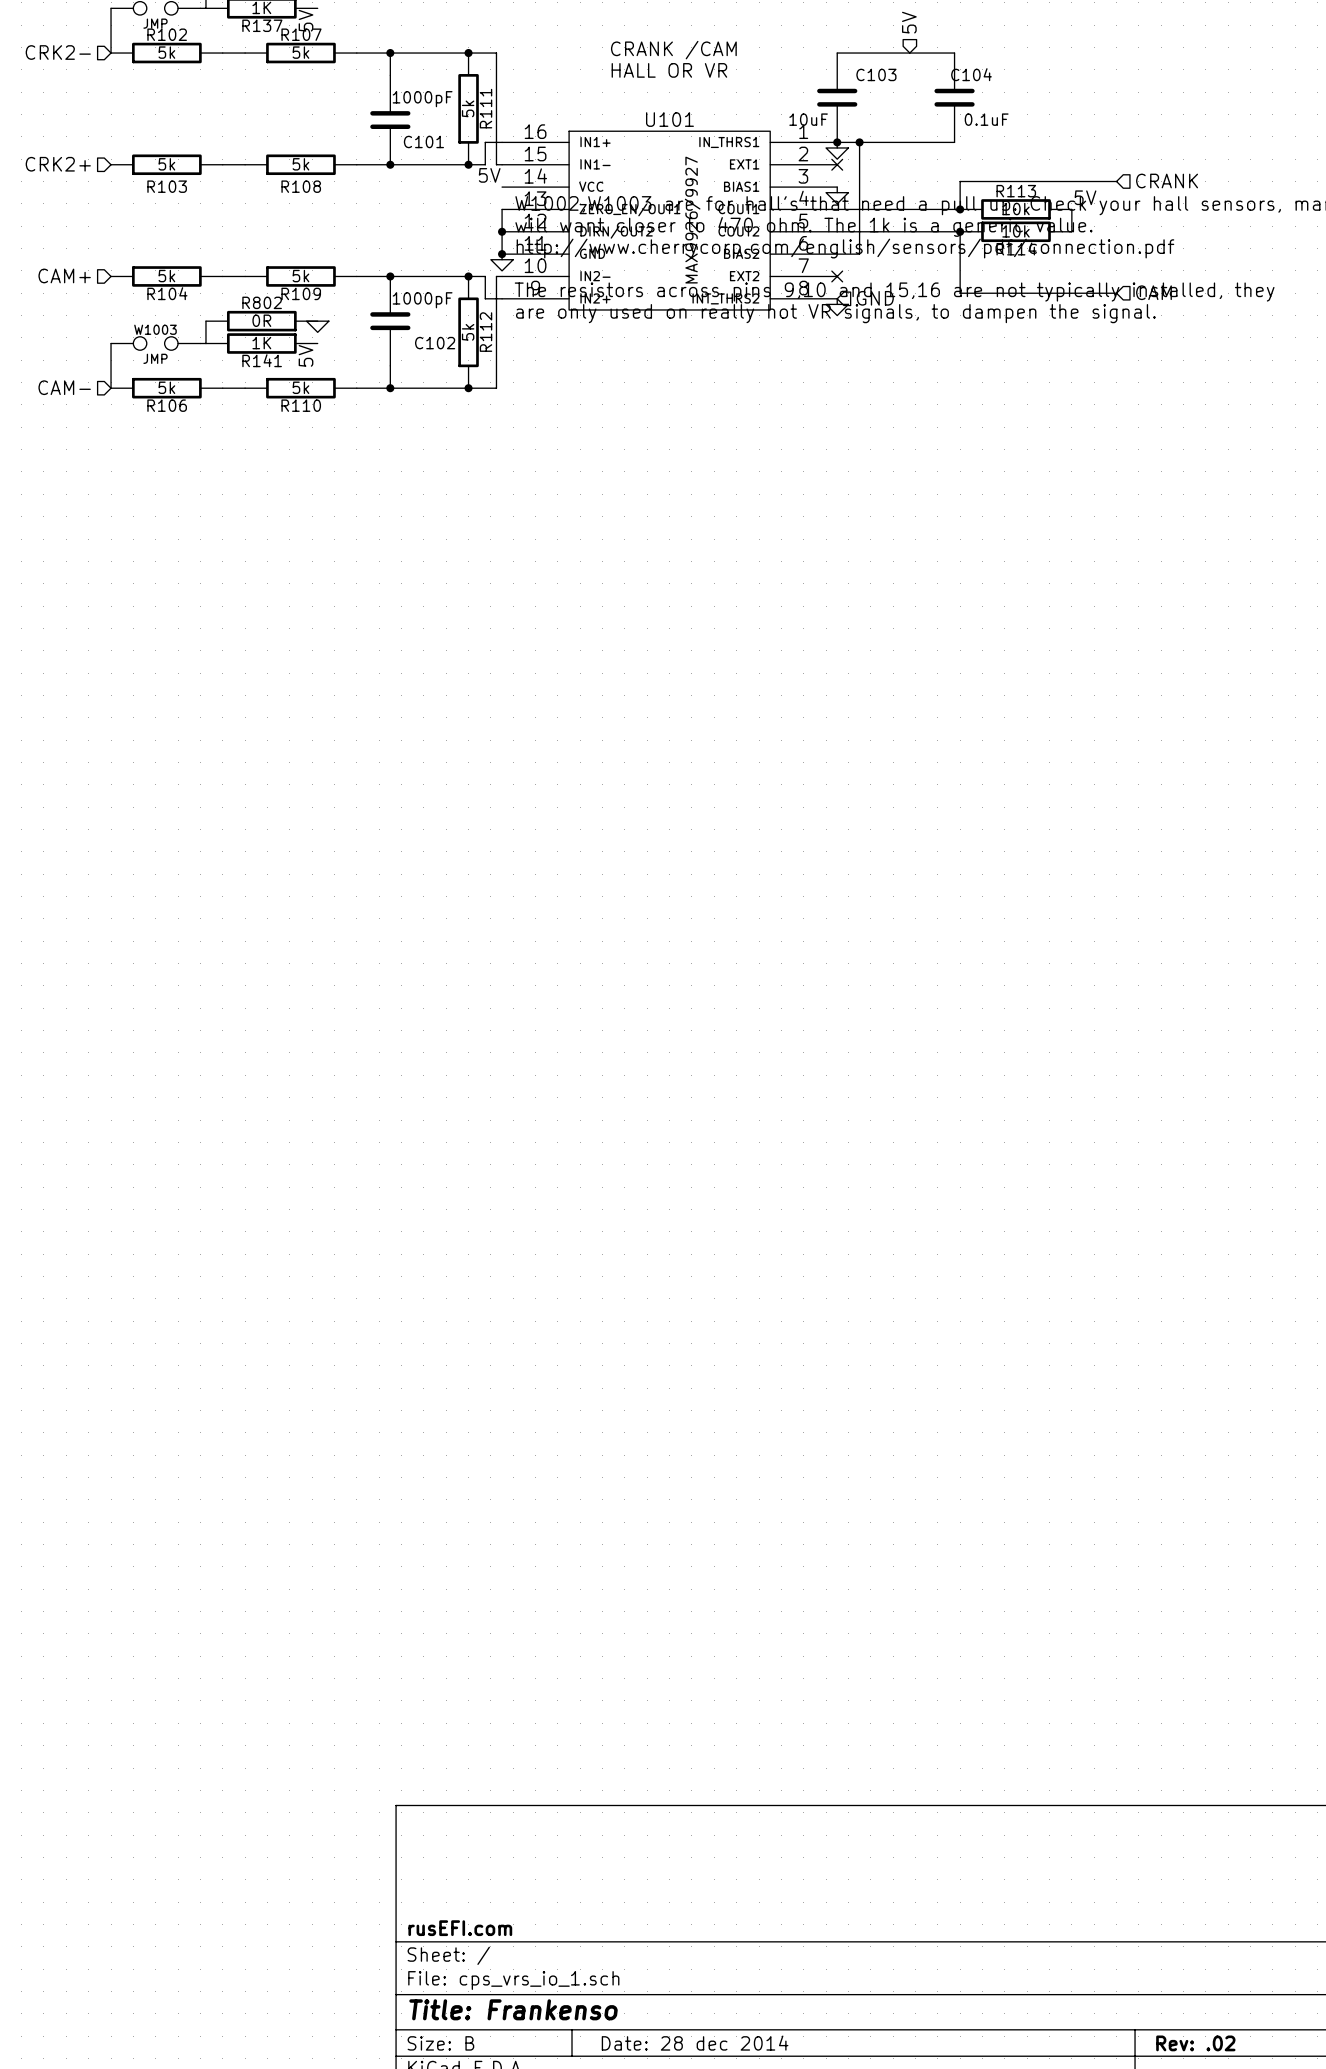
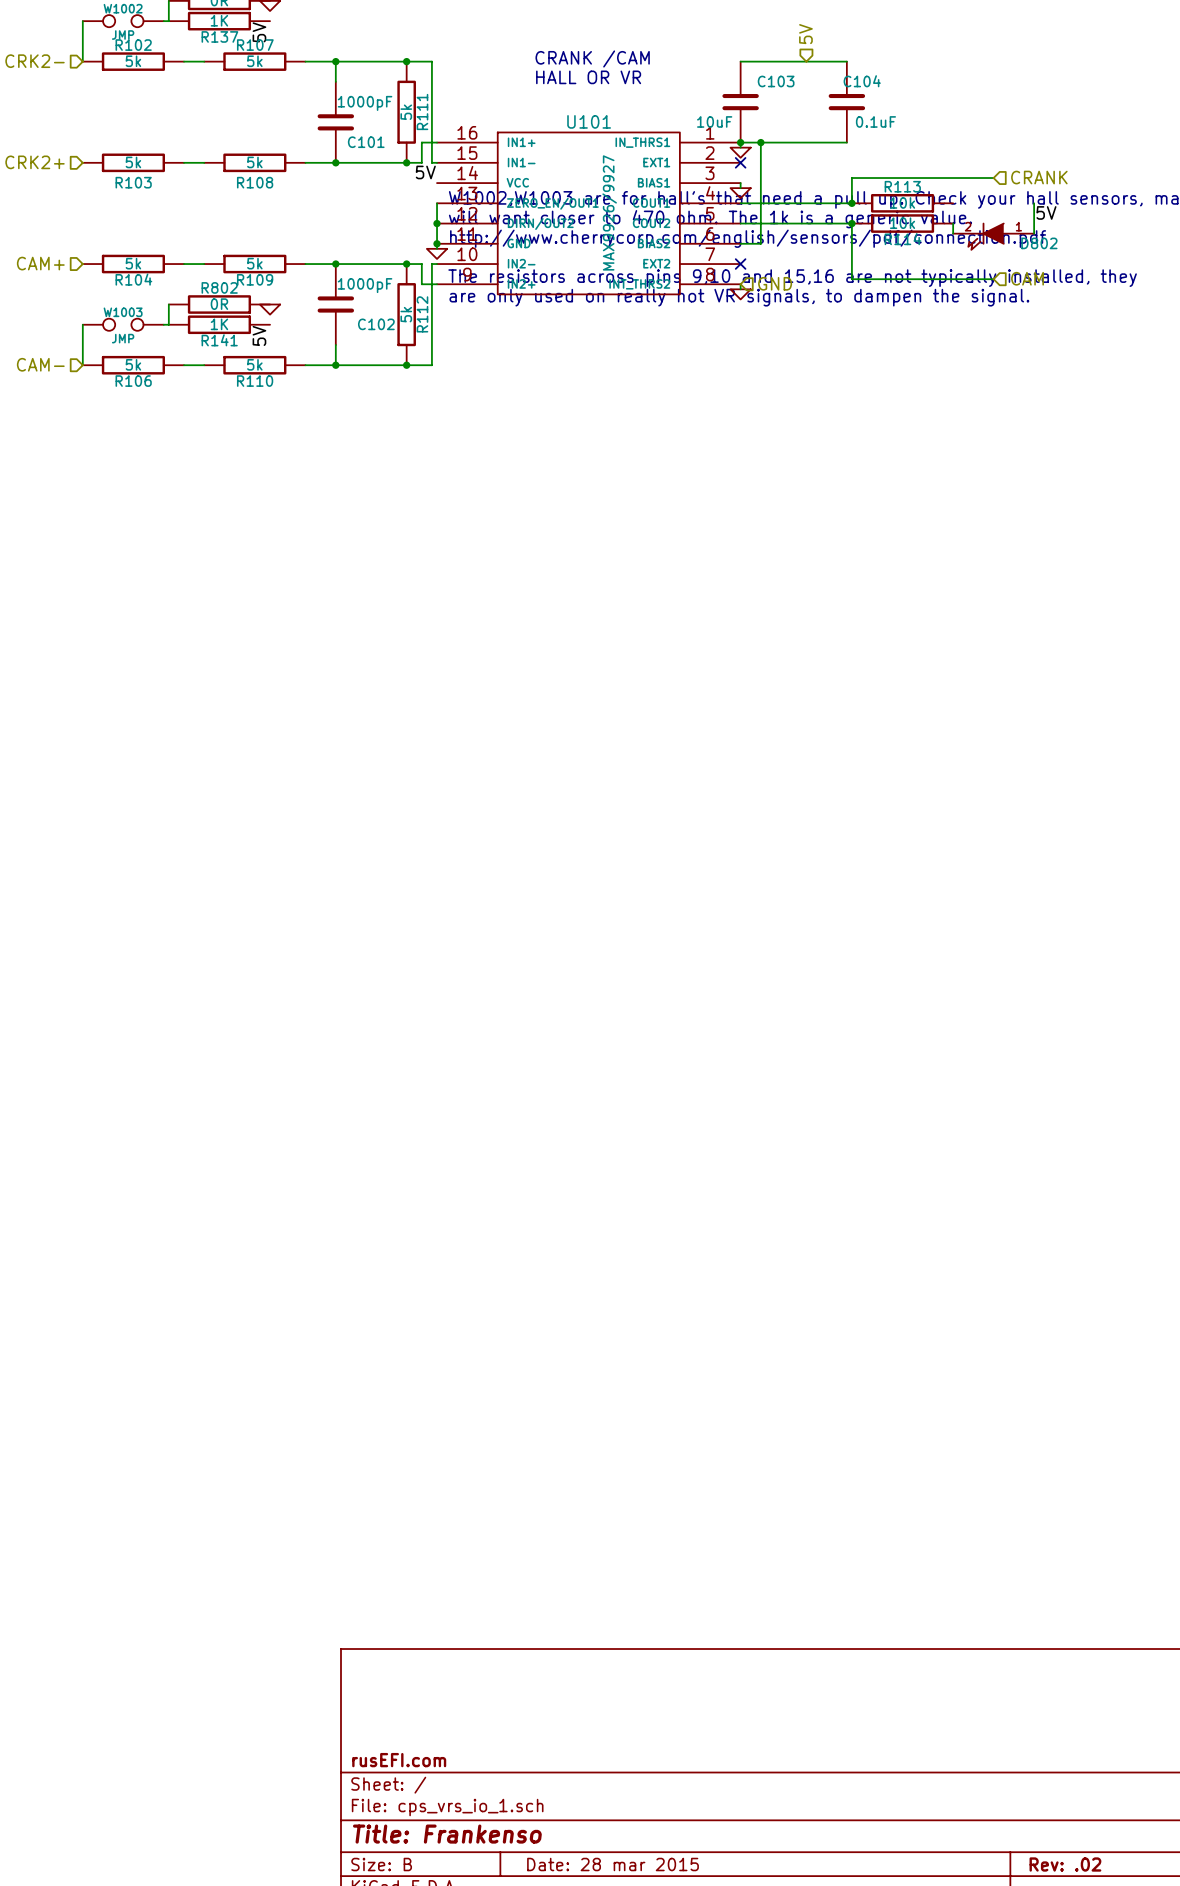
label position: 5V (1085, 197) -> 5V (1046, 212)
wire: (1071, 209) (1071, 231) -> (953, 233) (953, 223)
wire: none -> (1034, 203) (1034, 233)
D802: none -> (993, 236)
title block: Date: 28 dec 2014 (695, 2043) -> Date: 28 mar 2015 (613, 1864)

